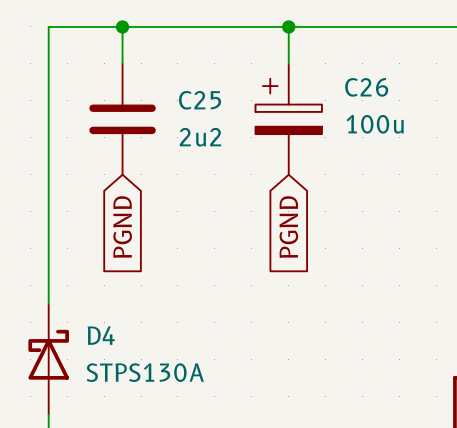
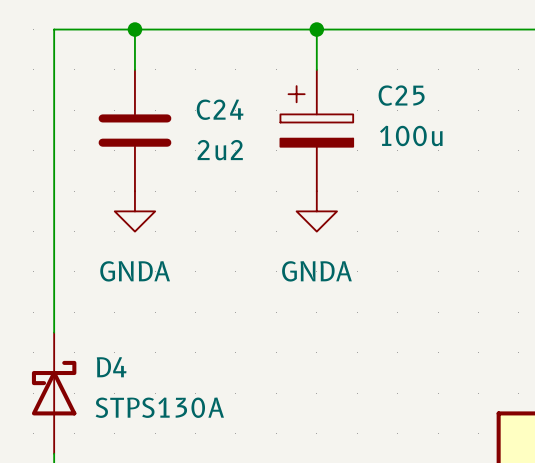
C26 name: C26 (366, 87) -> C25 (401, 95)
C25 name: C25 (200, 100) -> C24 (220, 109)
power symbol: none -> GNDA (134, 211)
power symbol: none -> GNDA (316, 211)
global label: PGND (122, 227) -> none
global label: PGND (288, 227) -> none

